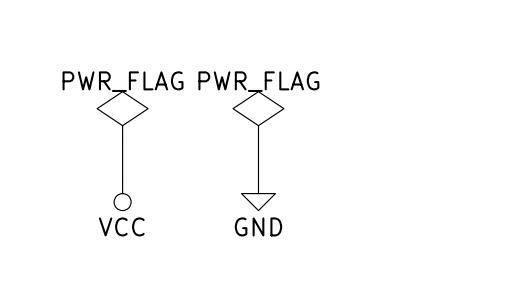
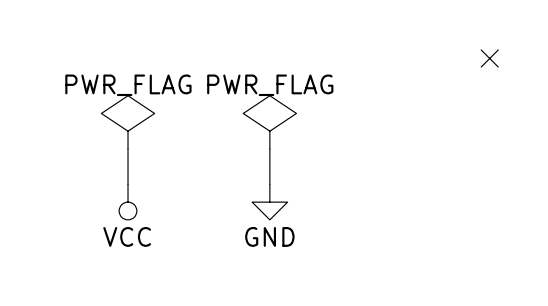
no-connect mark: none -> (489, 58)

